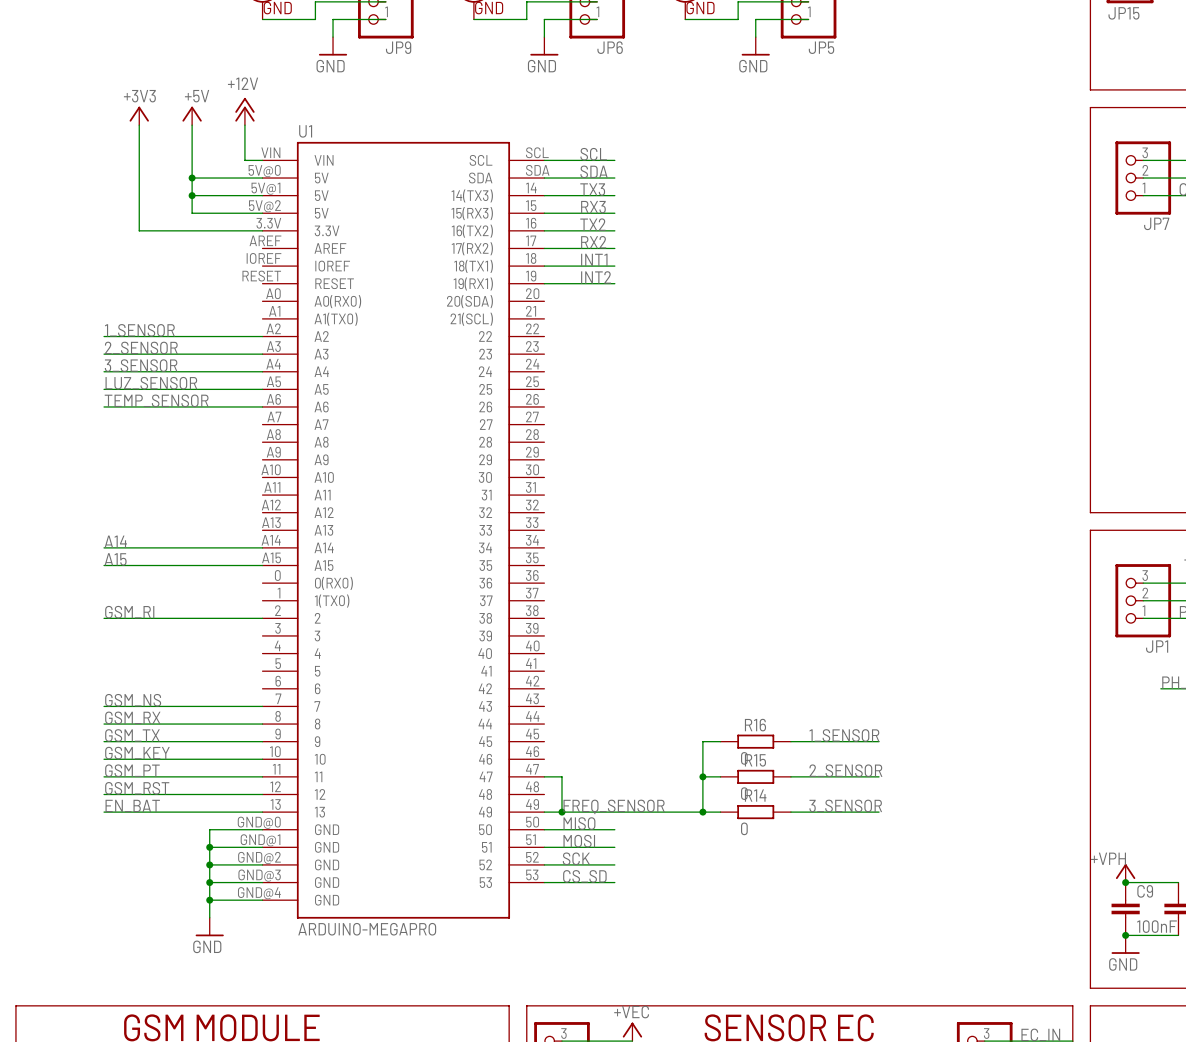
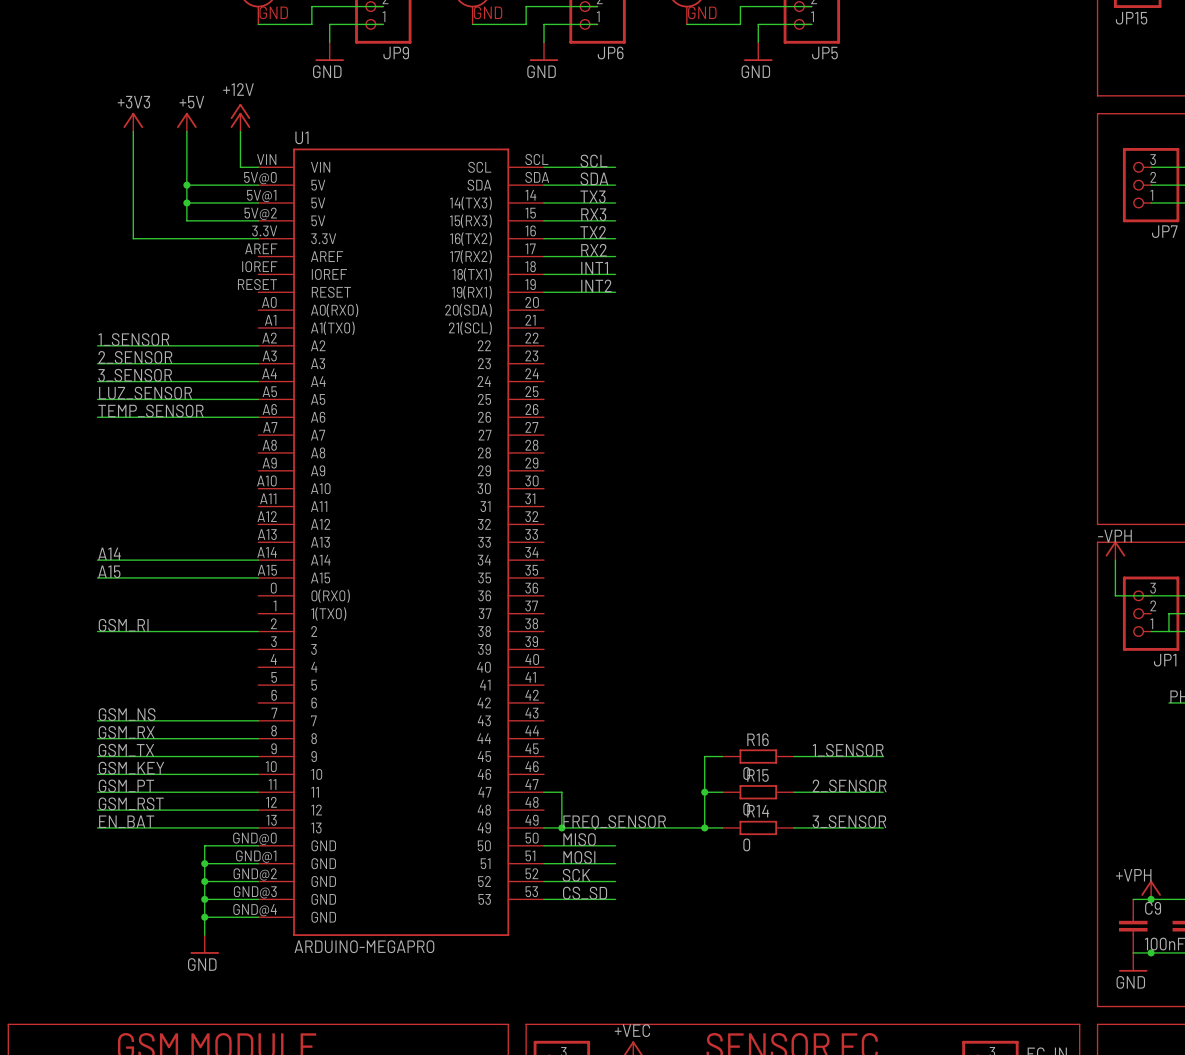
power symbol: none -> -VPH (1115, 550)
wire: none -> (1115, 560) (1115, 595) (1151, 595)
wire: (1143, 600) (1160, 600) -> (1168, 631) (1168, 613)
power symbol position: +VPH (1125, 873) -> +VPH (1151, 890)
junction position: (1125, 882) -> (1151, 899)
junction position: (1125, 935) -> (1151, 952)

